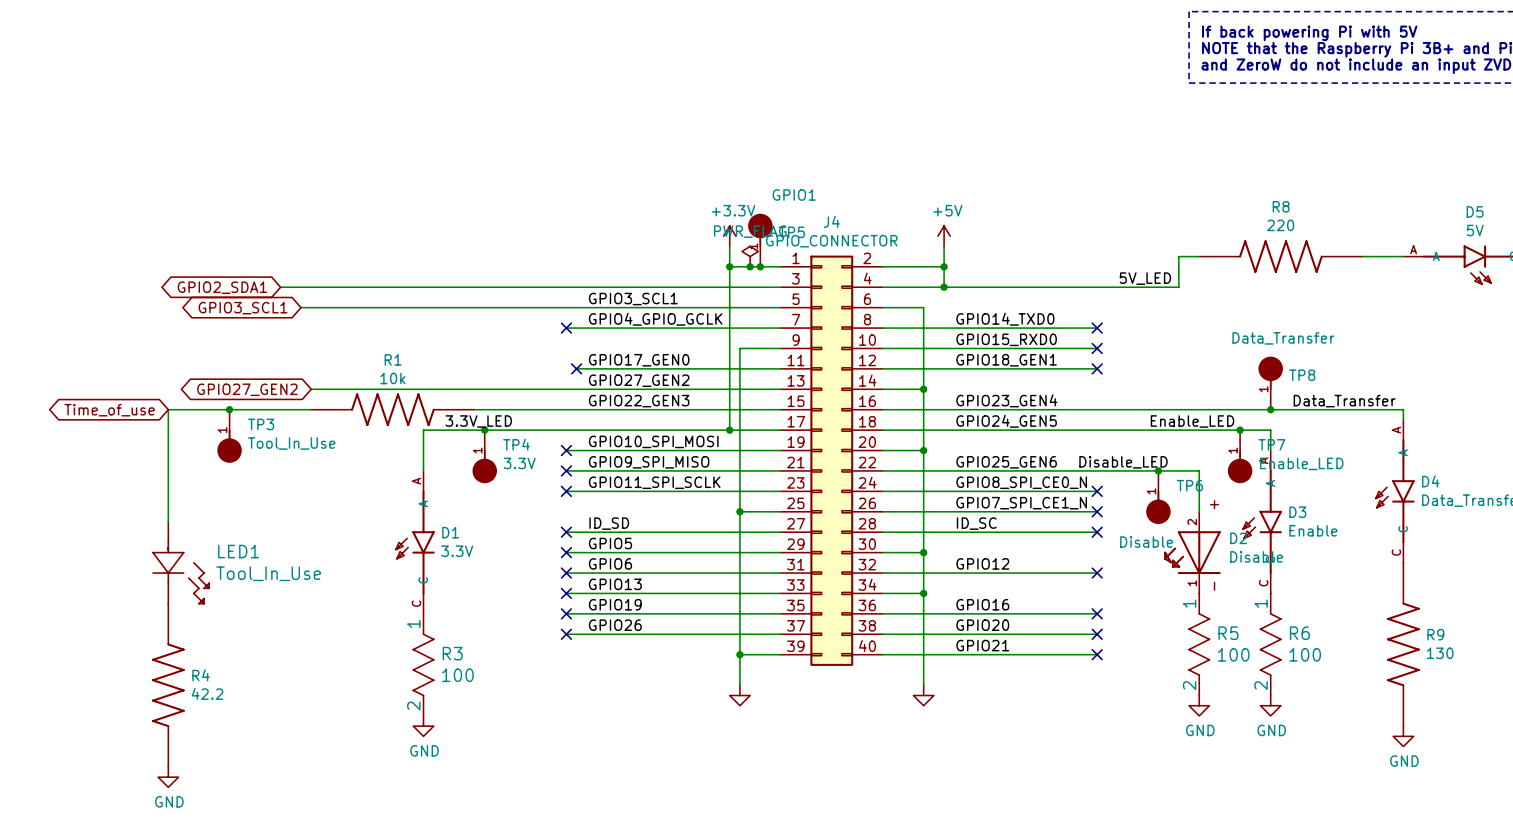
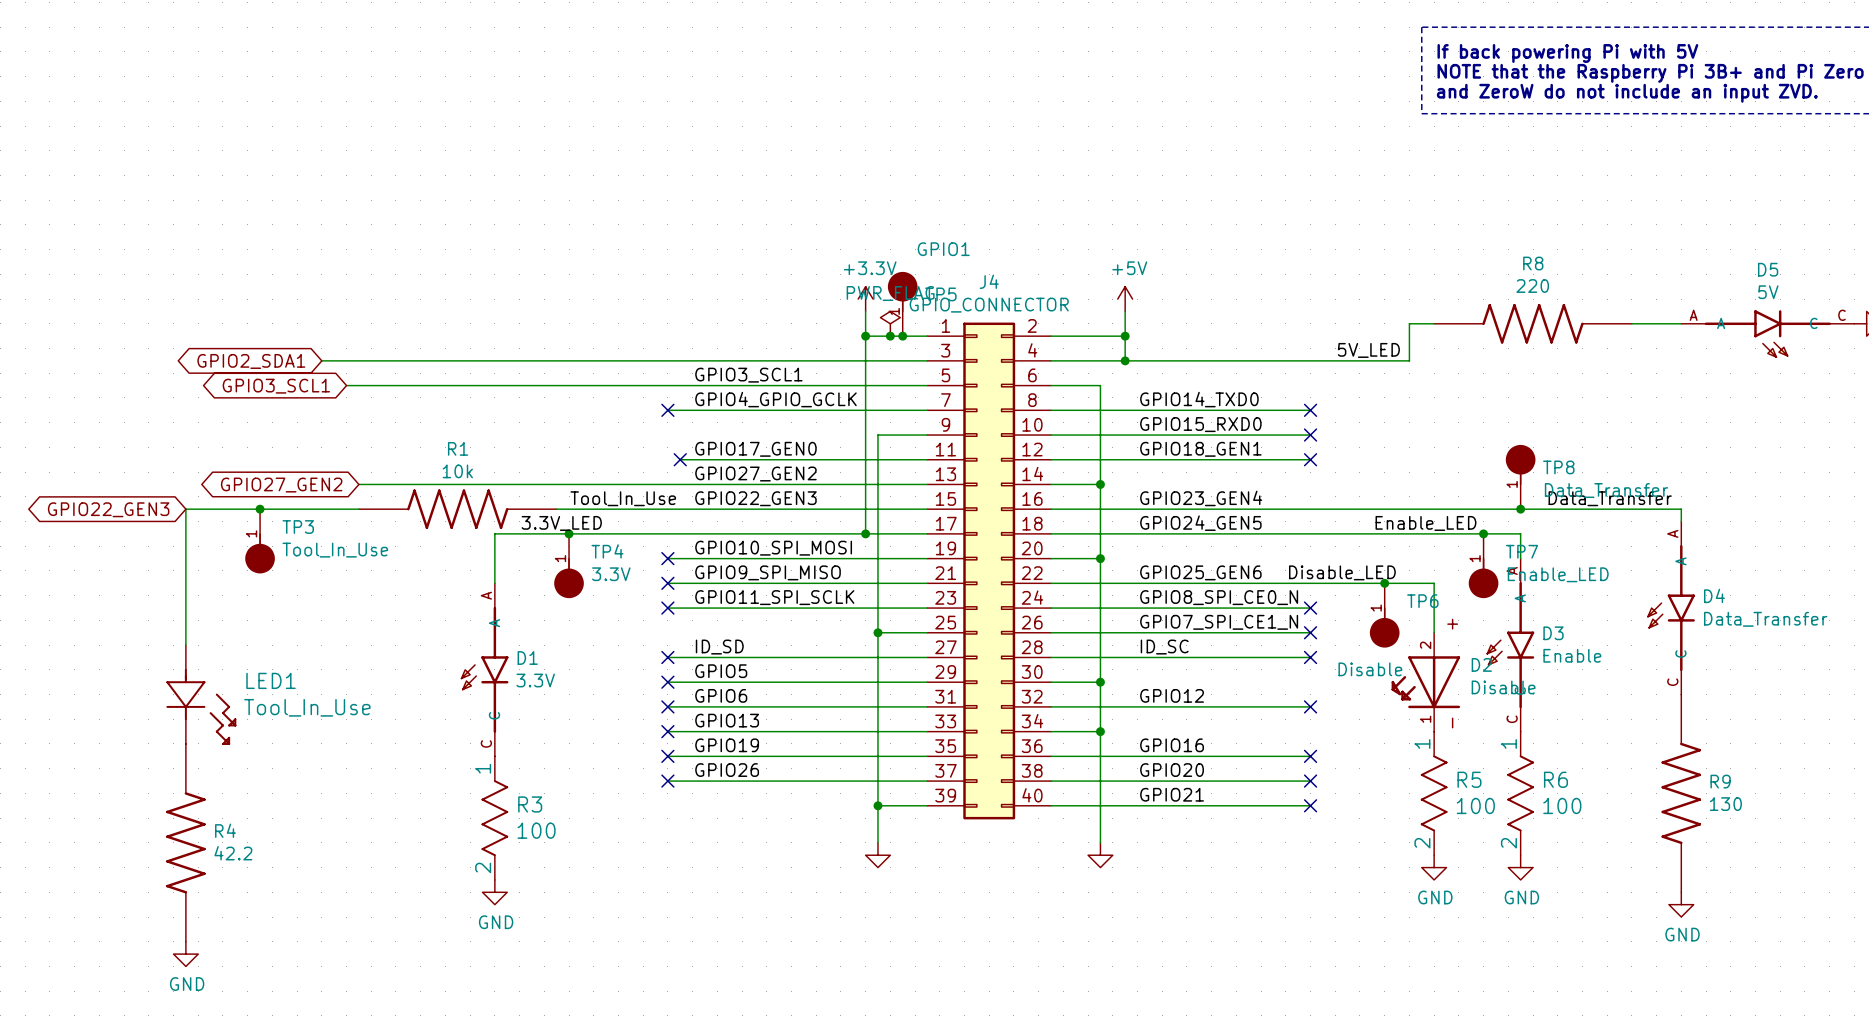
TP8 value position: Data_Transfer (1283, 338) -> Data_Transfer (1606, 490)
label: none -> Tool_In_Use (623, 498)
global label: Time_of_use (109, 410) -> GPIO22_GEN3 (108, 509)

